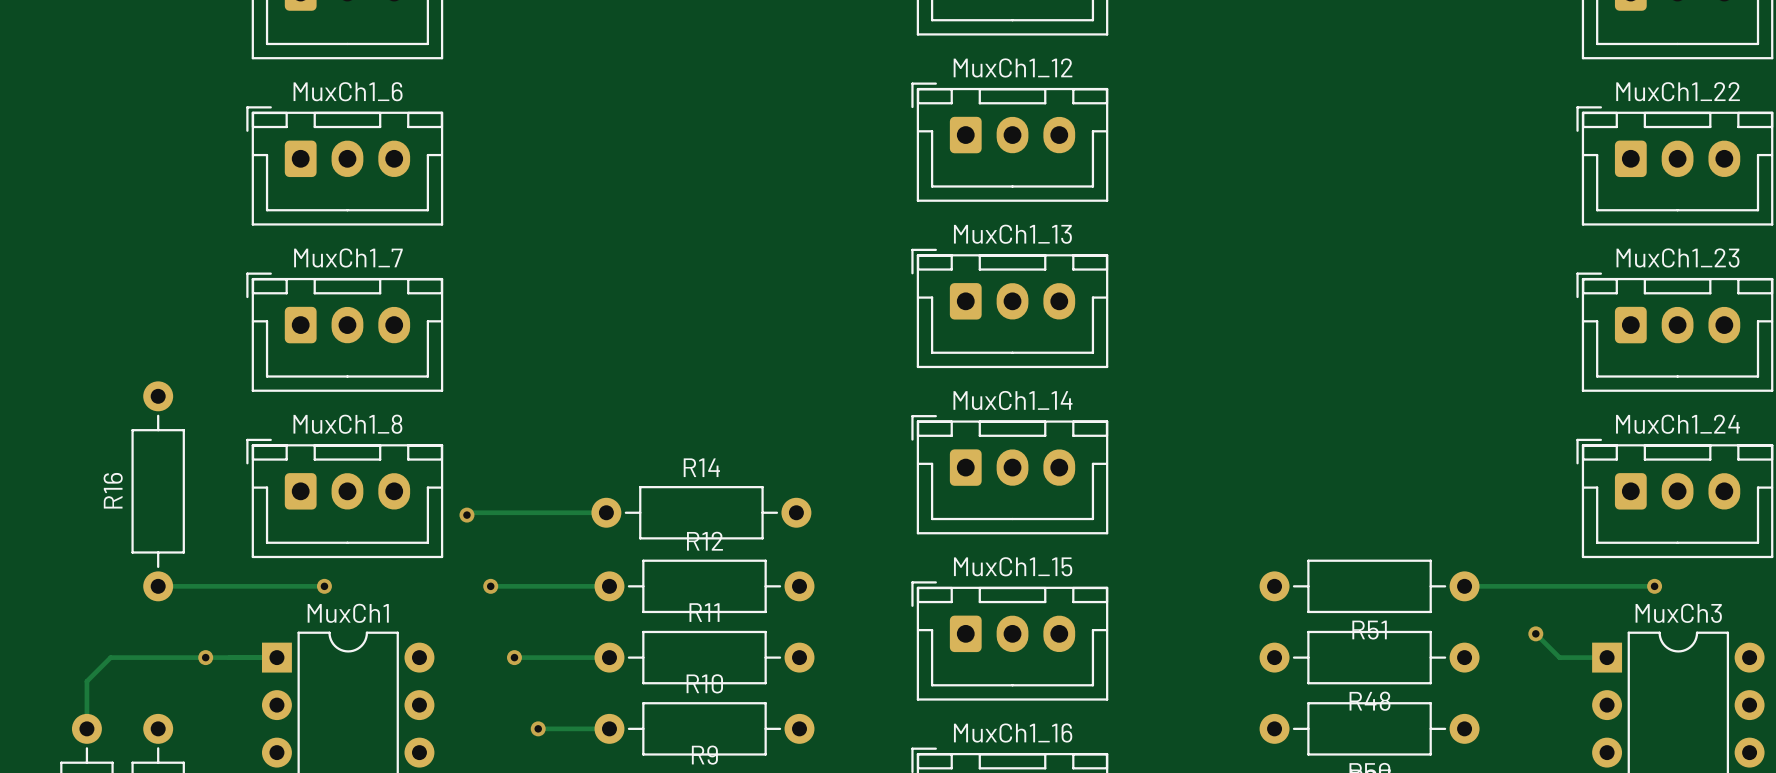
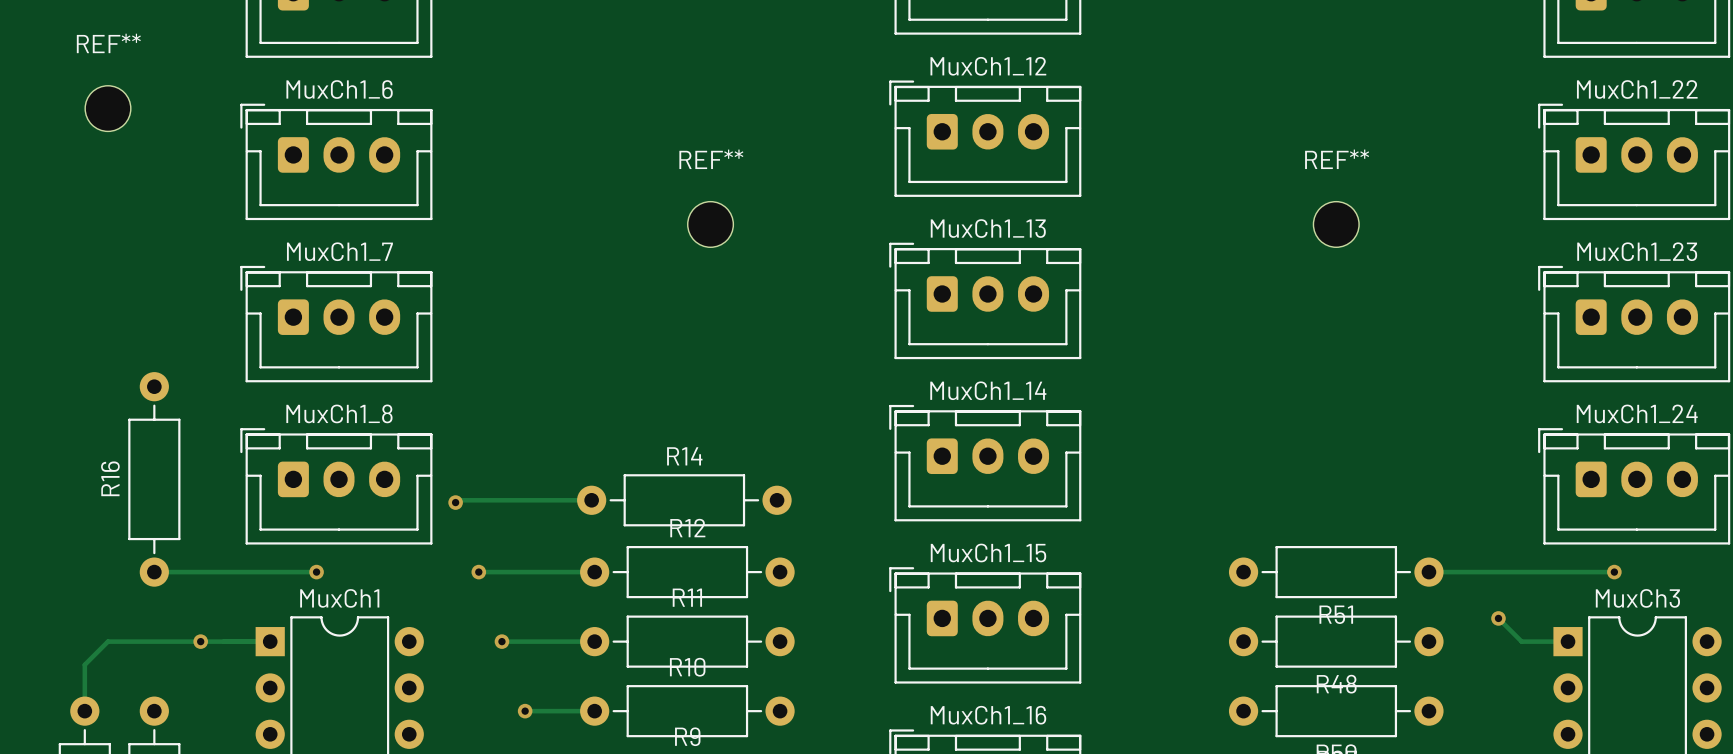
REF**: none -> (107, 108)
REF**: none -> (710, 224)
REF**: none -> (1336, 224)

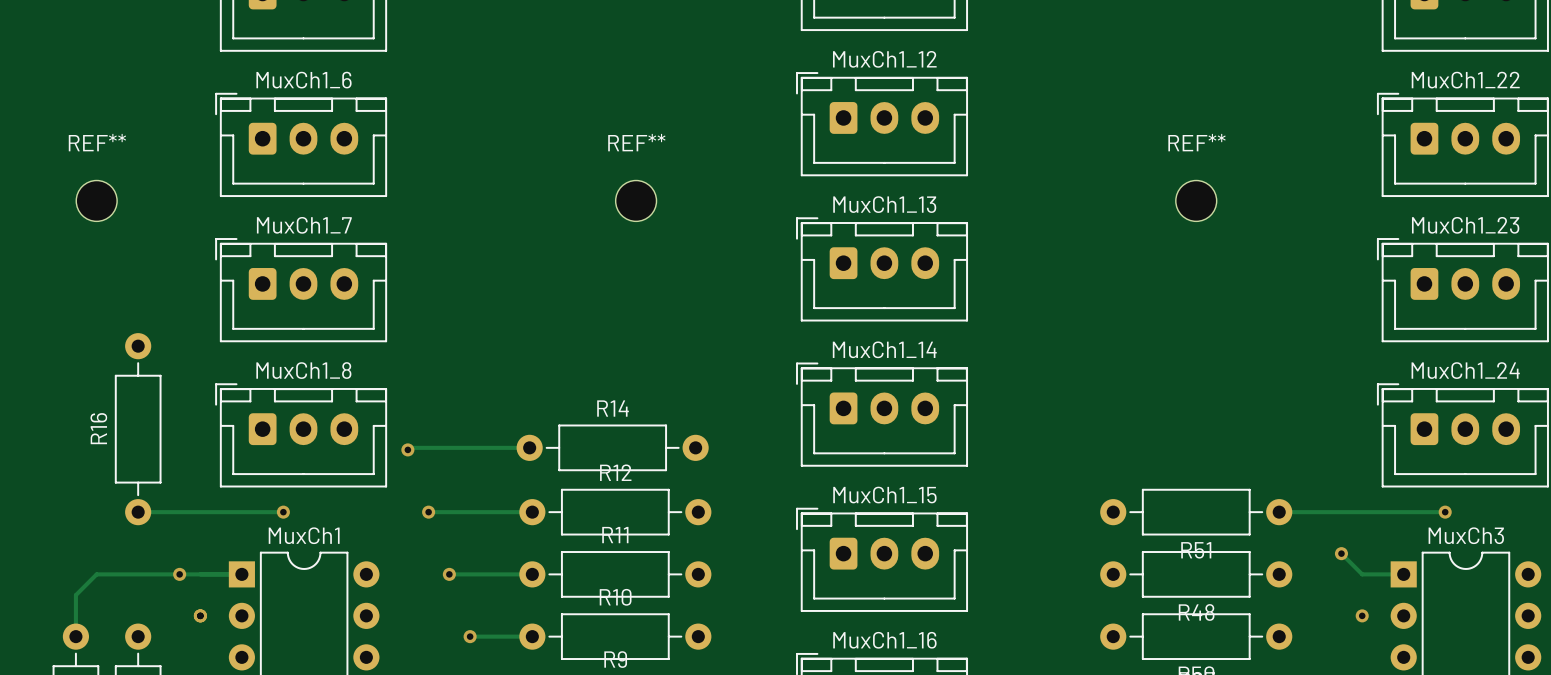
REF** position: (107, 108) -> (96, 200)
via: none -> (200, 615)
via: none -> (1362, 615)

